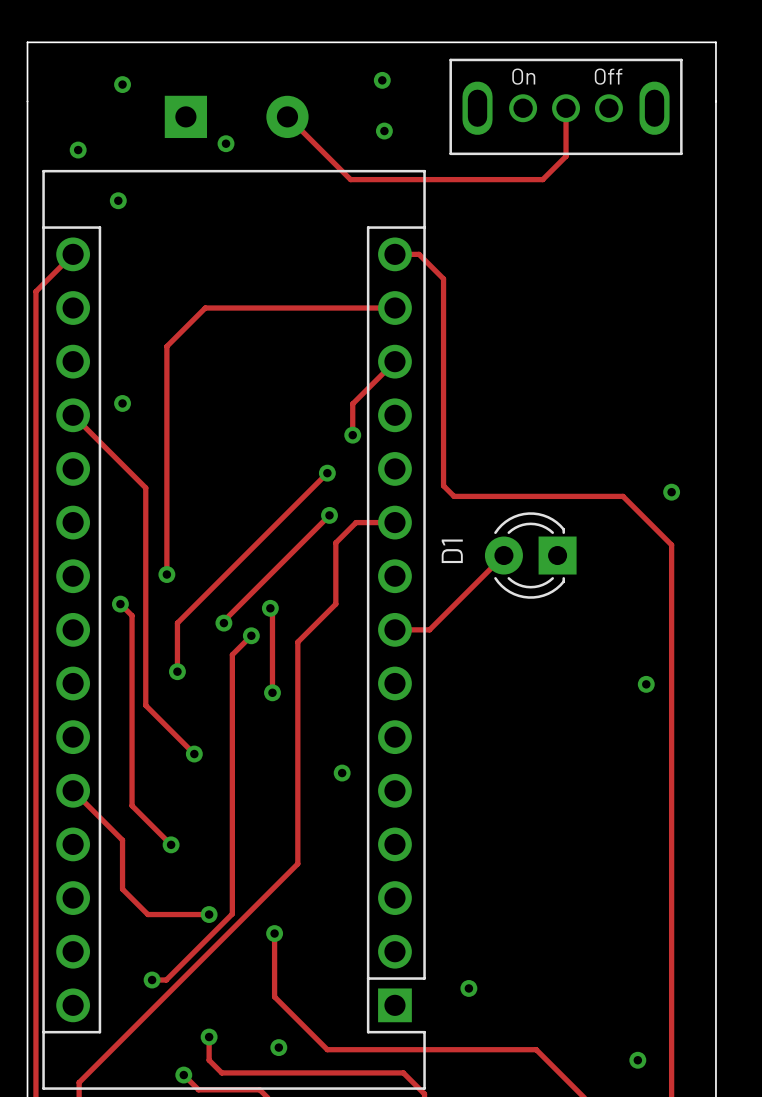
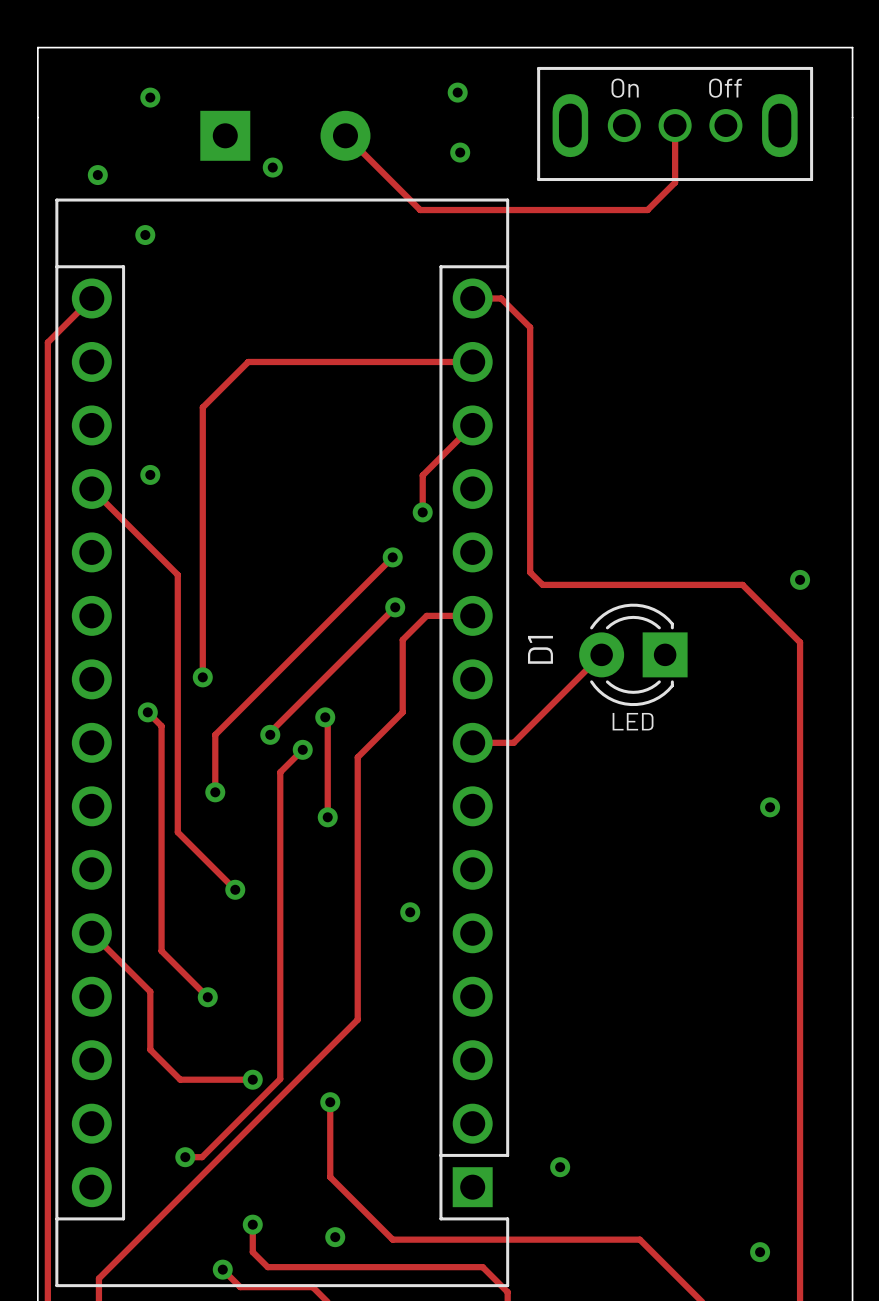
text: none -> LED (633, 721)

